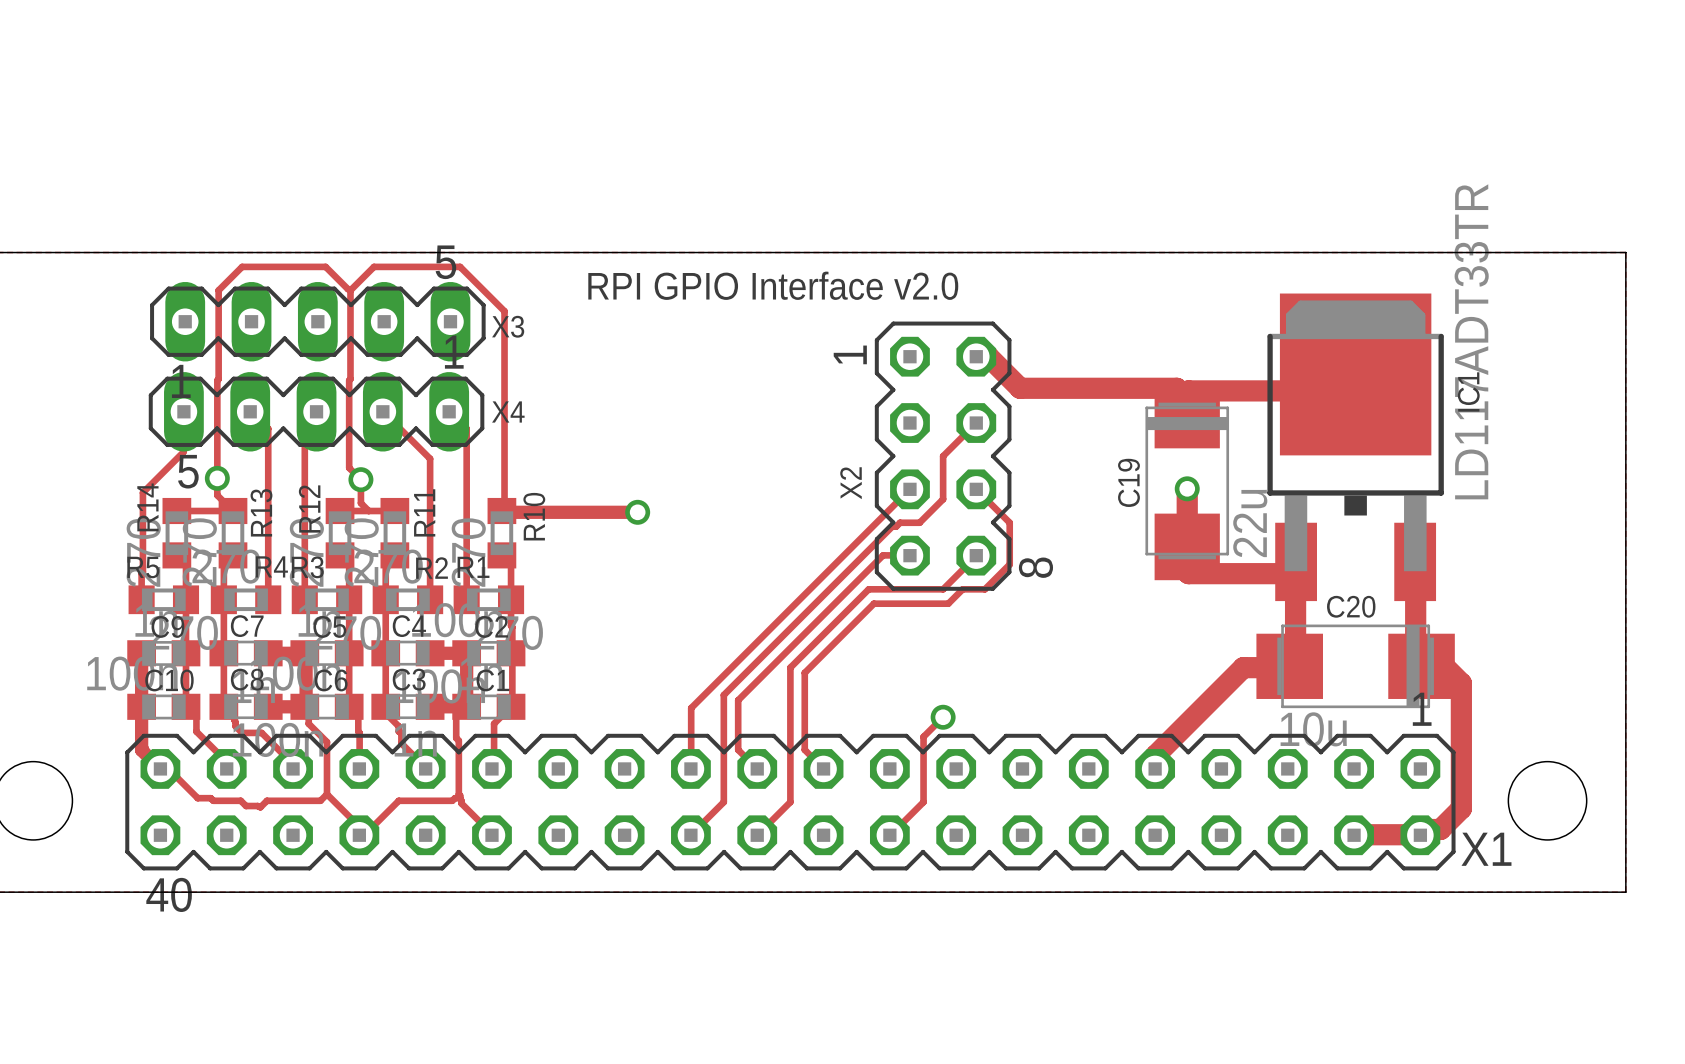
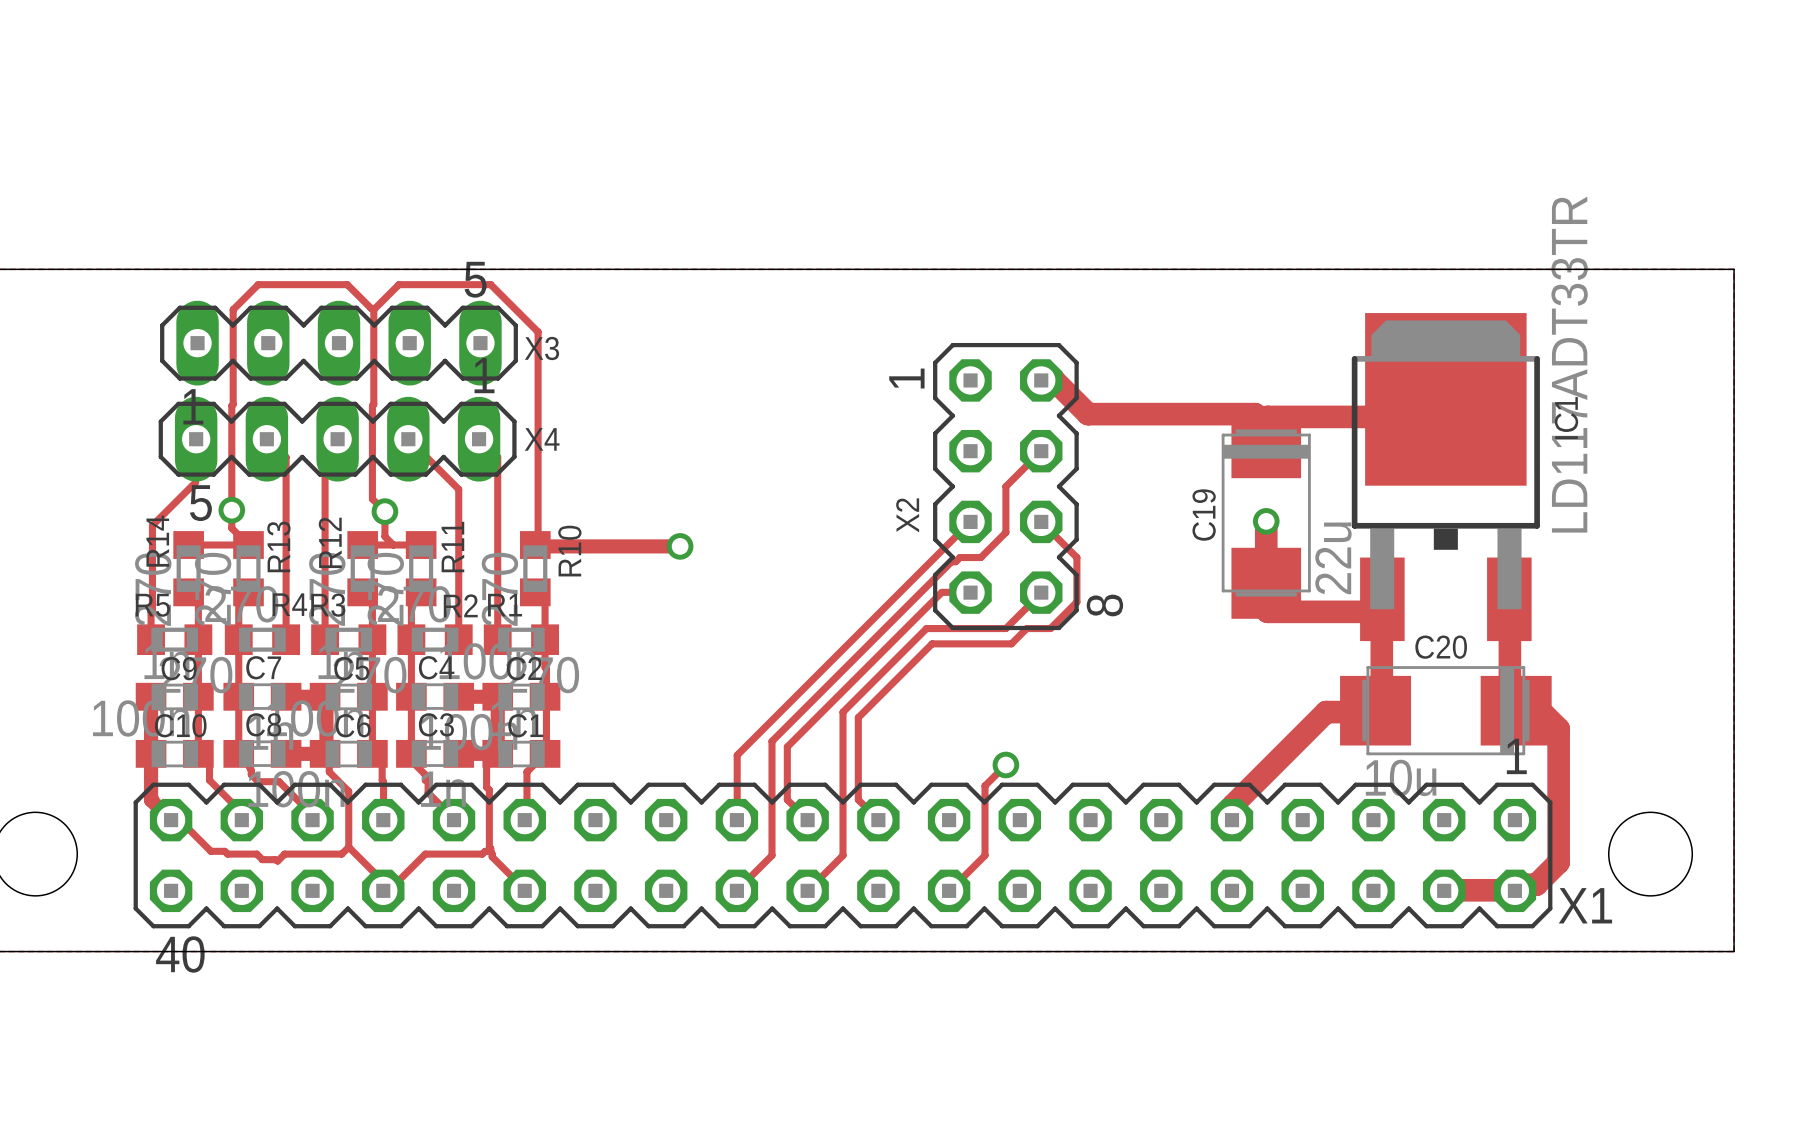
text: RPI GPIO Interface v2.0 (773, 285) -> none

